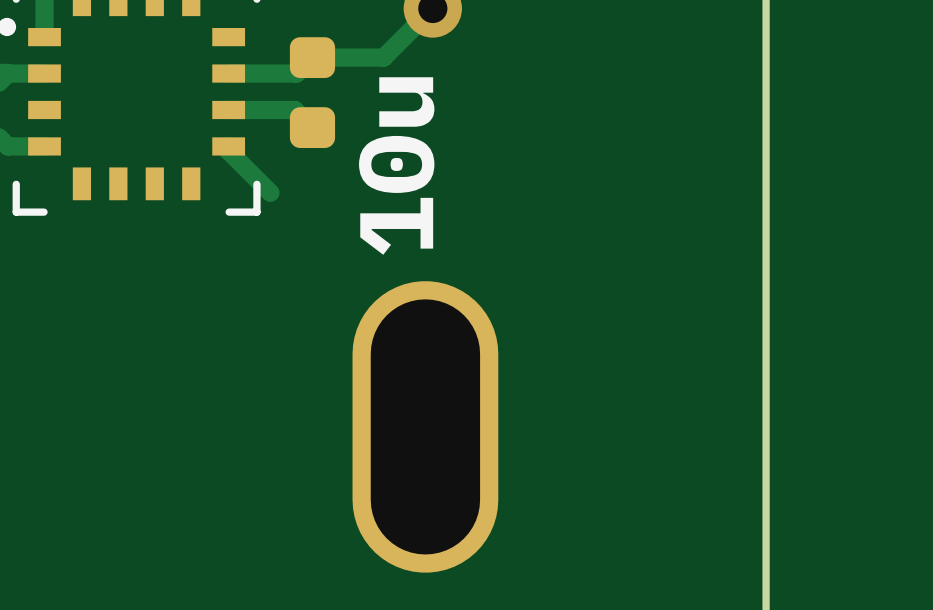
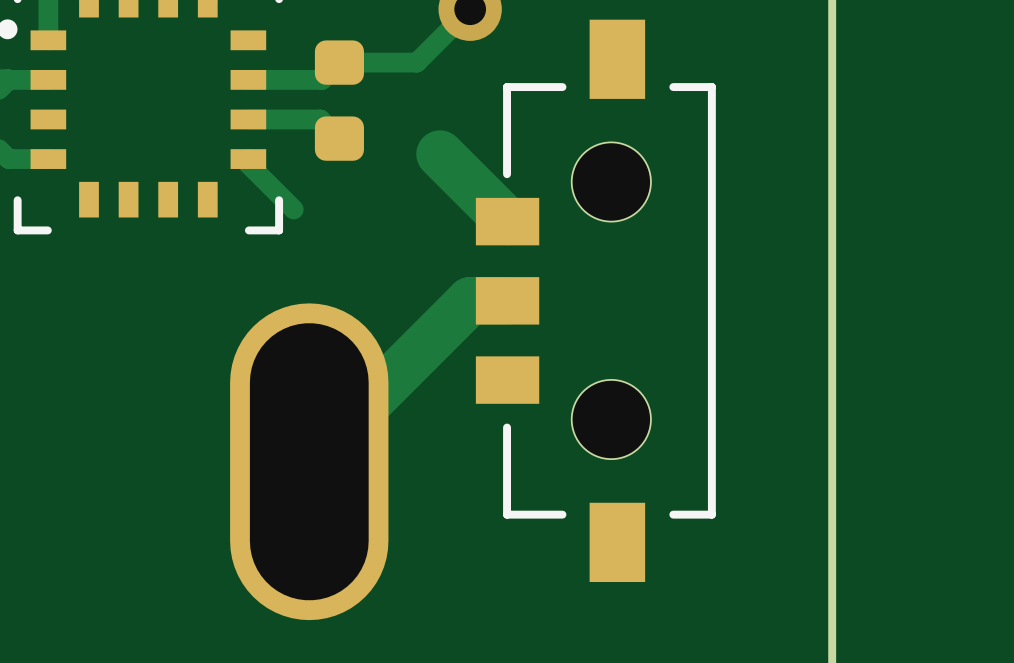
track: none -> (440, 154) (507, 221) (501, 221)
text: 10u (396, 166) -> none
track: none -> (507, 300) (470, 300) (309, 461)
part: none -> (595, 300)
part position: (425, 426) -> (309, 461)

